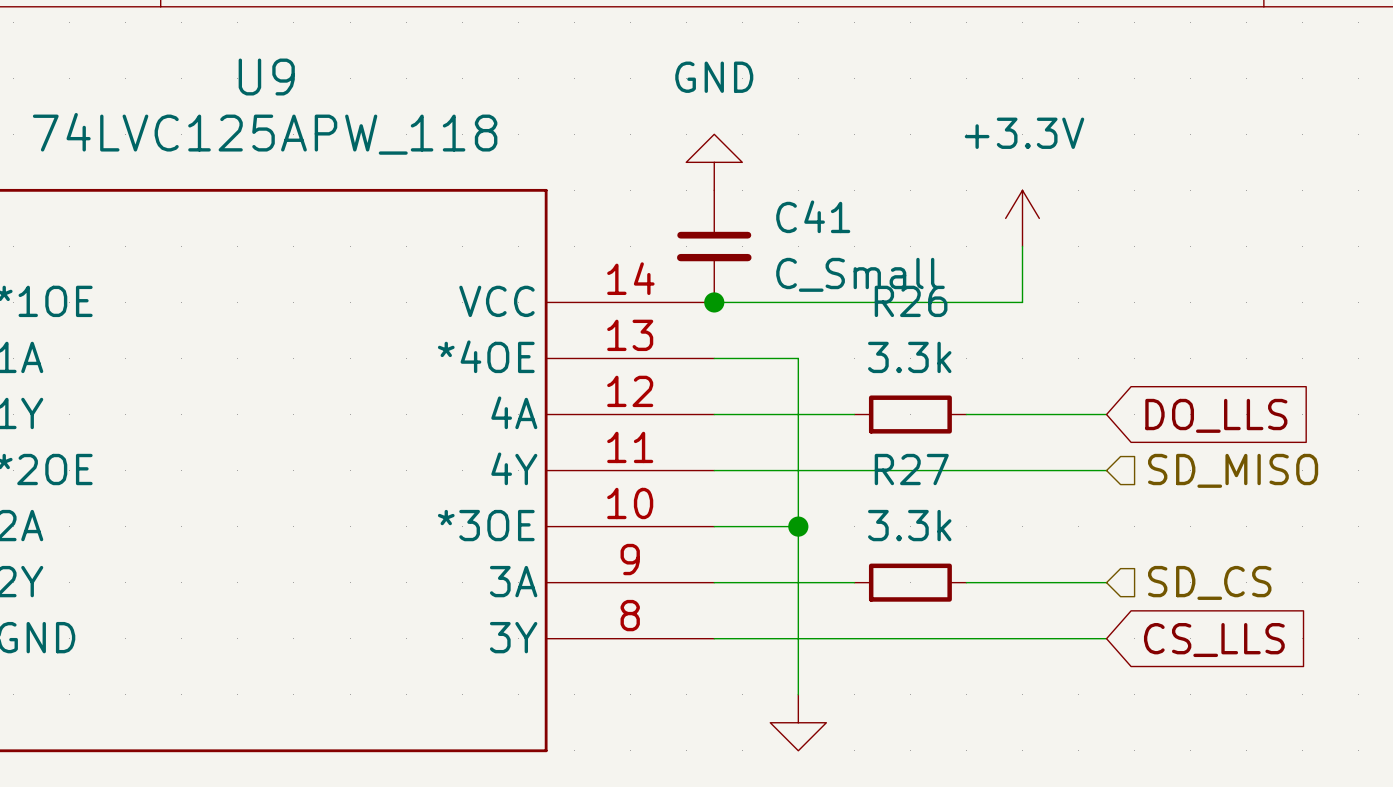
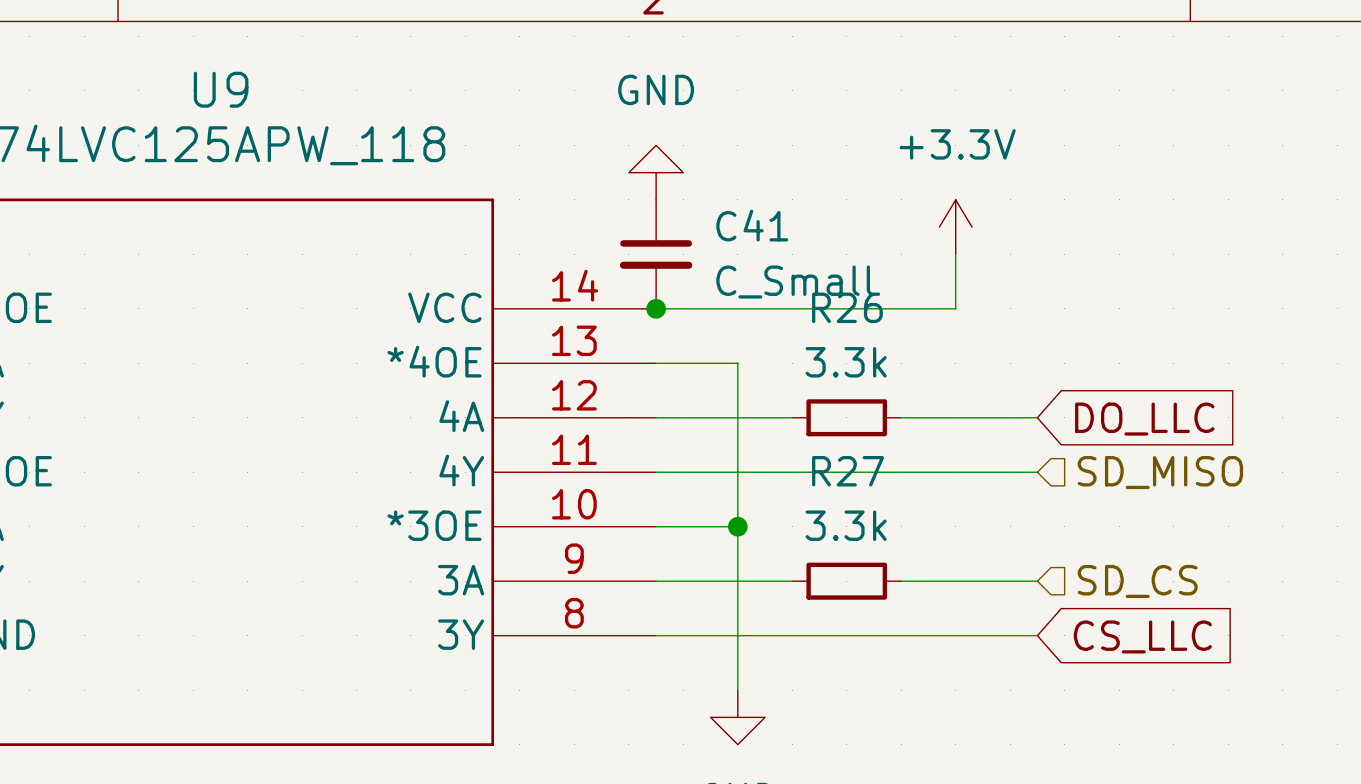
global label: DO_LLS (1216, 415) -> DO_LLC (1144, 419)
global label: CS_LLS (1214, 640) -> CS_LLC (1142, 636)

